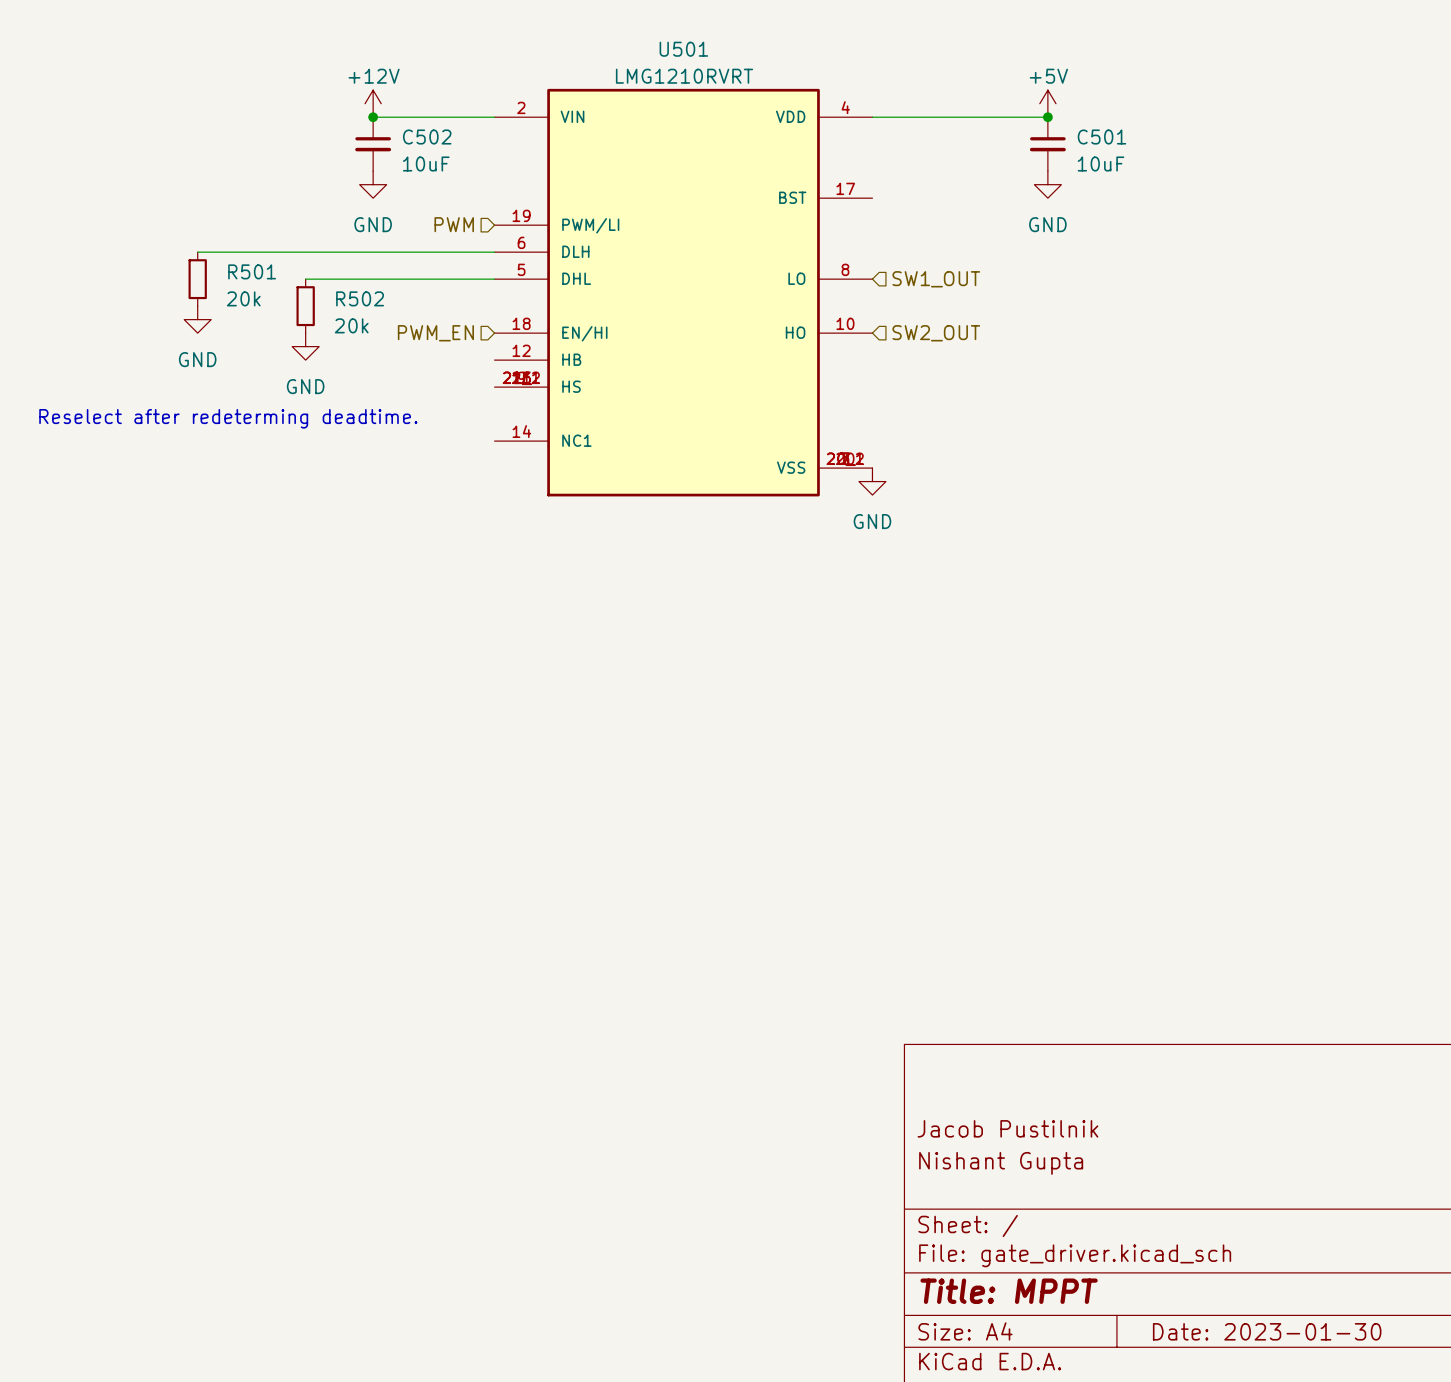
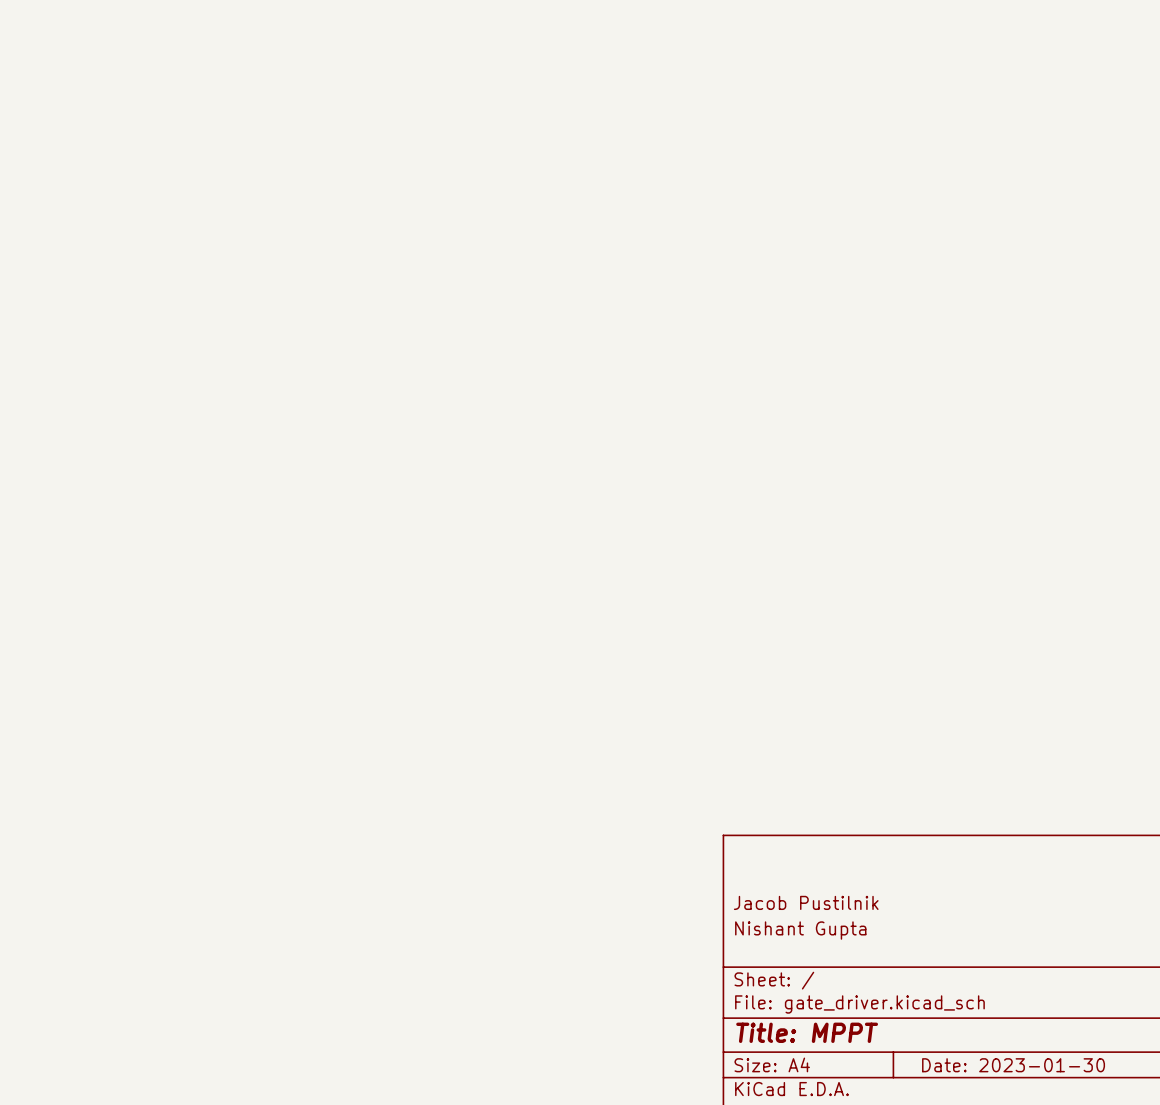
power symbol: +12V (373, 103) -> none
power symbol: +5V (1047, 103) -> none
wire: (373, 117) (494, 117) -> none
junction: (373, 117) -> none
wire: (872, 117) (1047, 117) -> none
junction: (1047, 117) -> none
C502: 10uF (373, 144) -> none
C501: 10uF (1047, 144) -> none
power symbol: GND (373, 184) -> none
power symbol: GND (1047, 184) -> none
hierarchical label: PWM (454, 224) -> none
wire: (197, 252) (494, 252) -> none
R501: 20k (197, 279) -> none
wire: (305, 279) (494, 279) -> none
hierarchical label: SW1_OUT (936, 279) -> none
U501: LMG1210RVRT (683, 292) -> none
R502: 20k (305, 306) -> none
power symbol: GND (197, 319) -> none
hierarchical label: PWM_EN (435, 333) -> none
hierarchical label: SW2_OUT (936, 333) -> none
power symbol: GND (305, 346) -> none
text: Reselect after redeterming deadtime. (228, 418) -> none
power symbol: GND (872, 481) -> none

